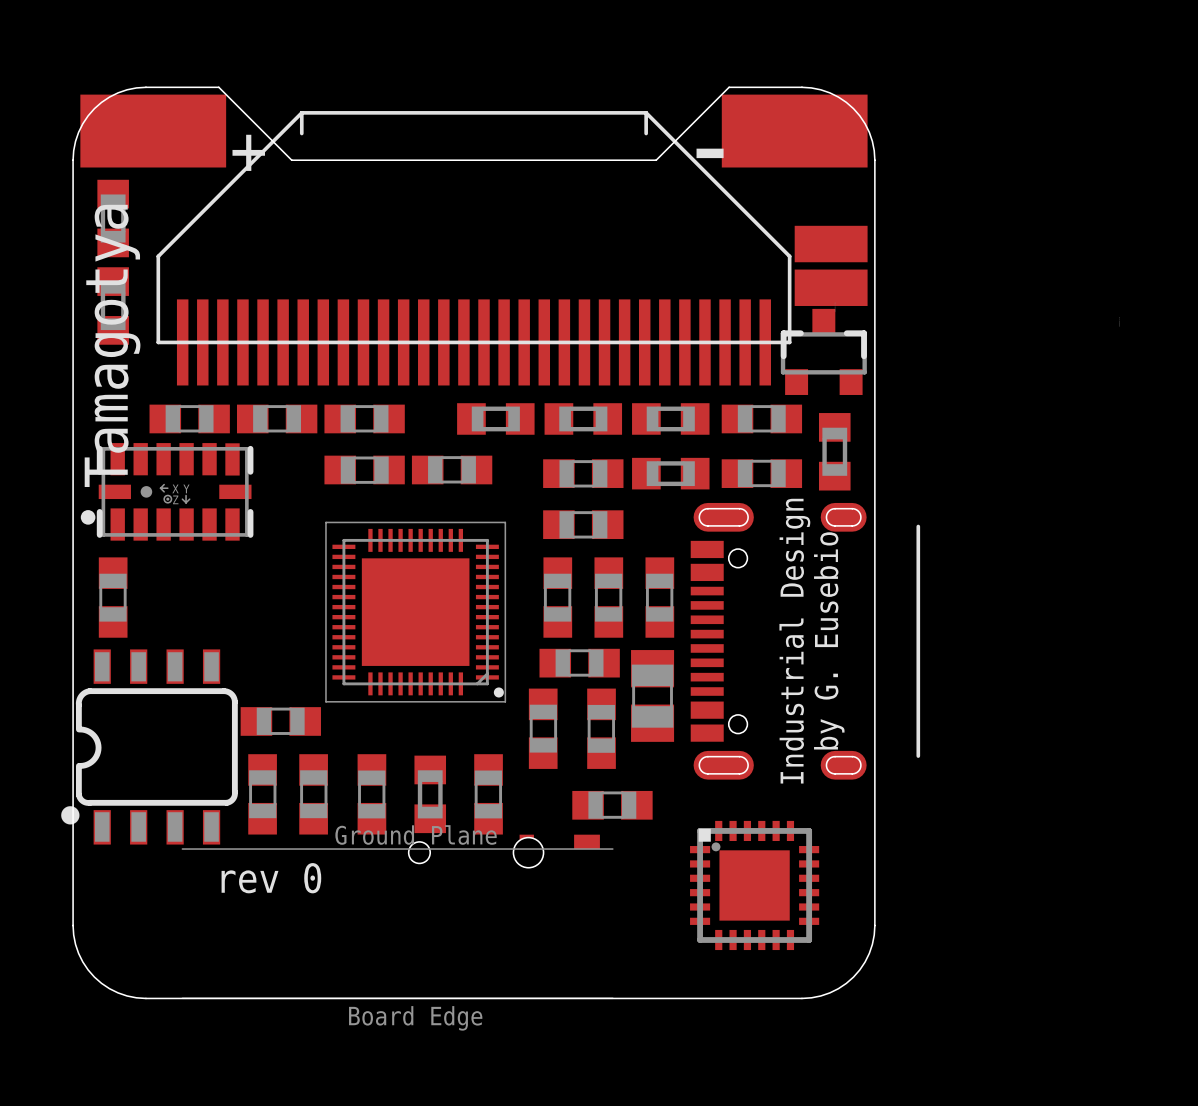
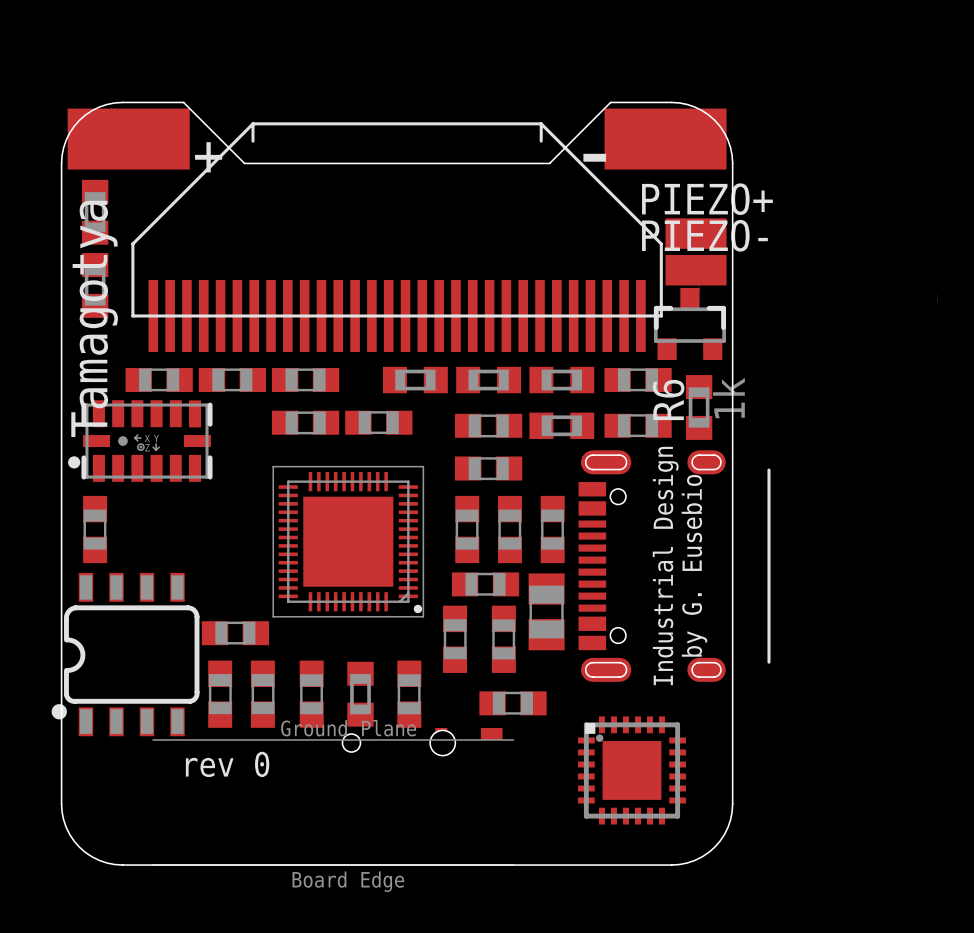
PIEZO+ name: none -> PIEZO+ (707, 199)
PIEZO- name: none -> PIEZO- (704, 235)
R6 value: none -> 1k (728, 398)
R6 name: none -> R6 (668, 399)

